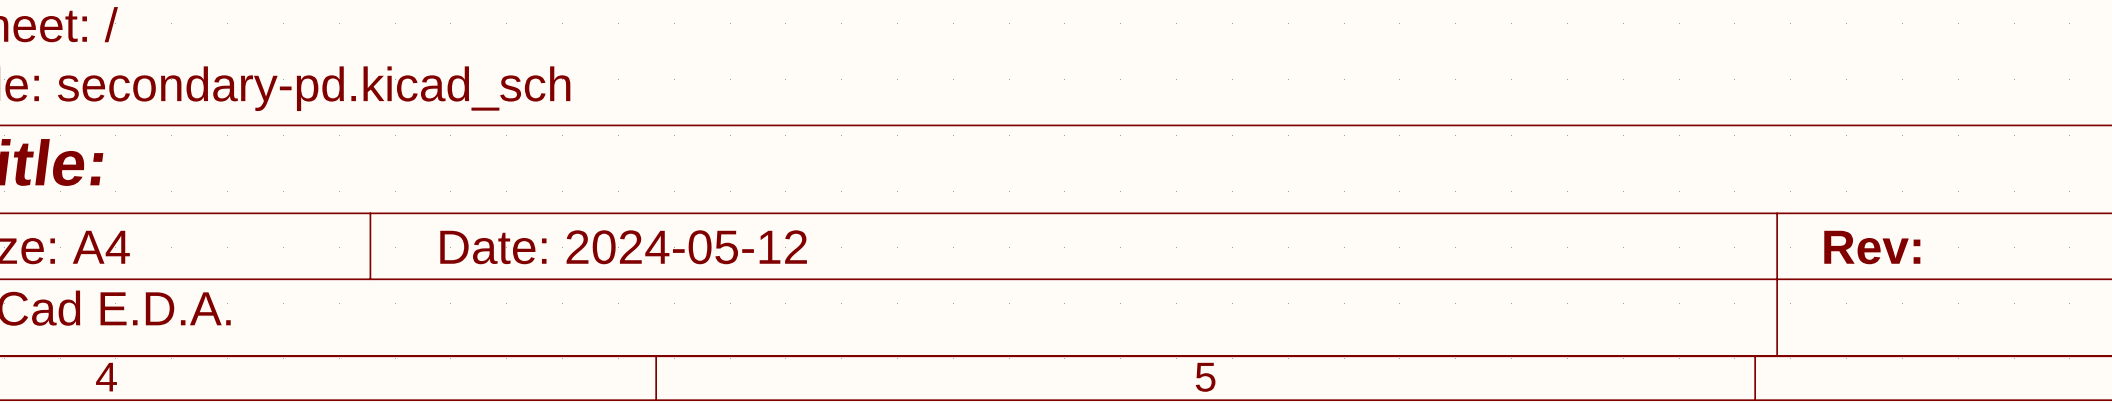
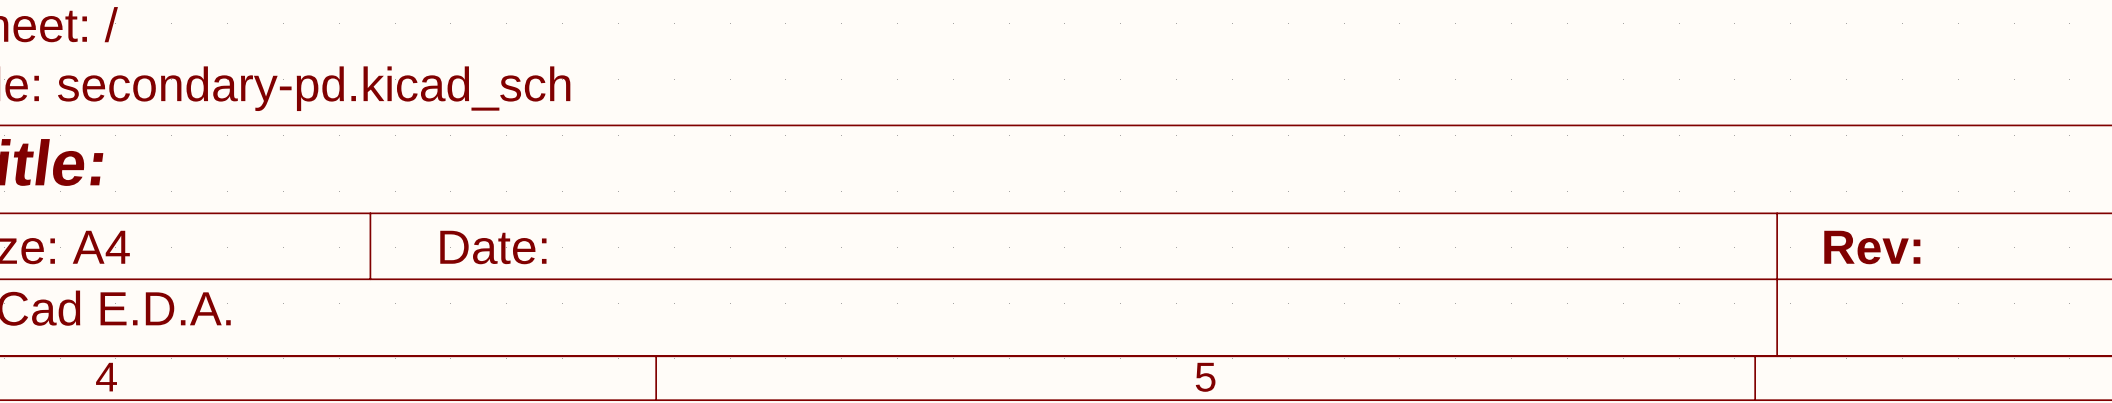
title block: Date: 2024-05-12 (623, 247) -> Date: (493, 247)

